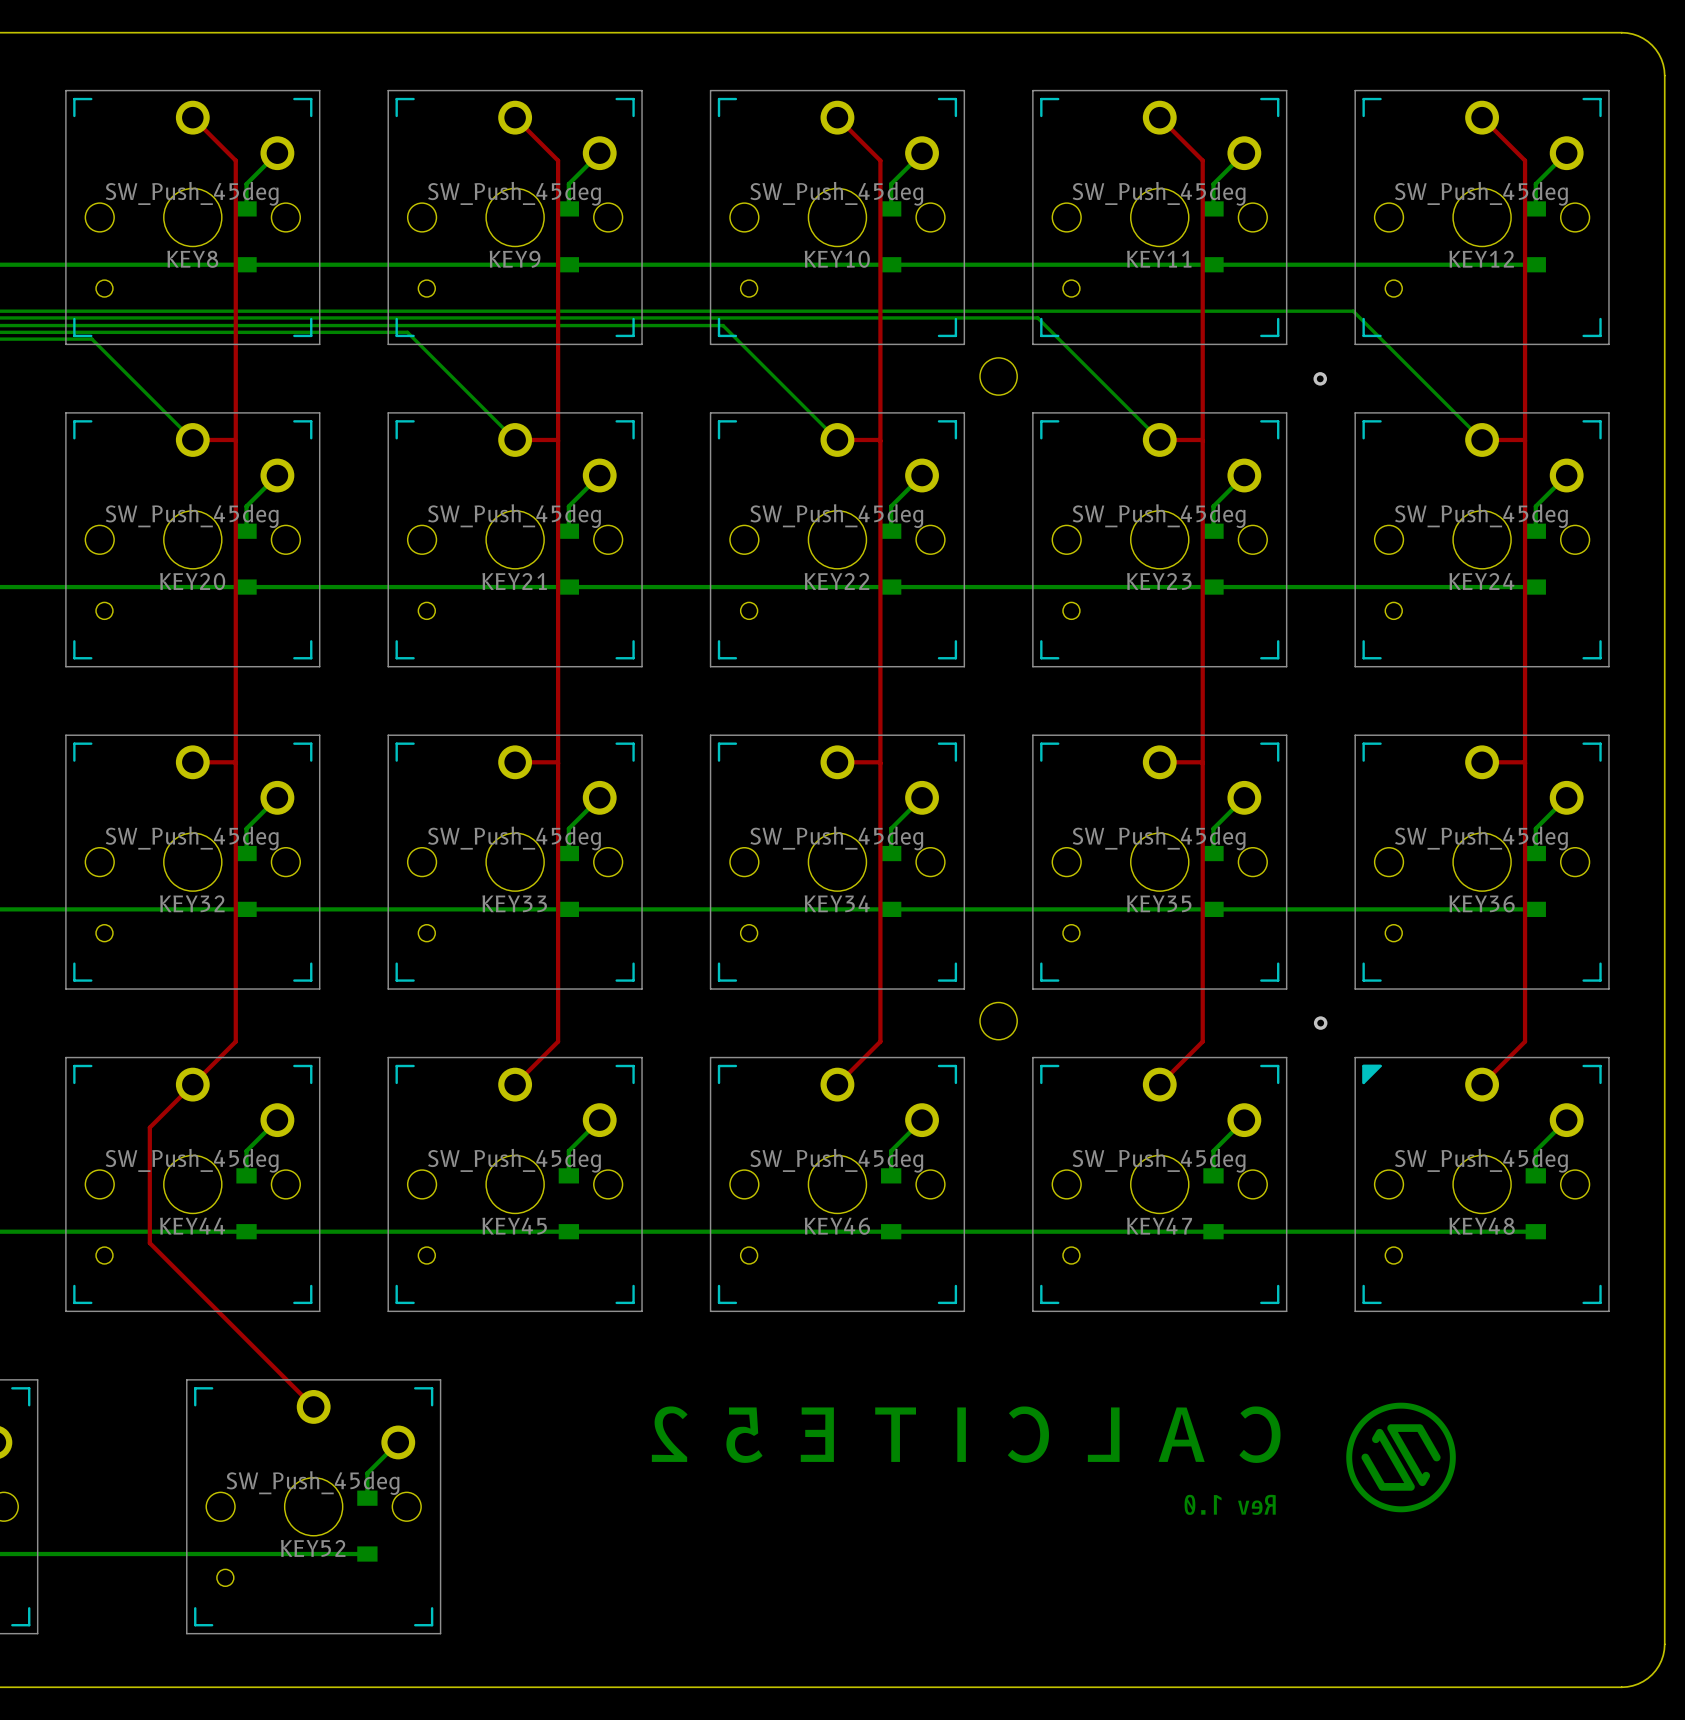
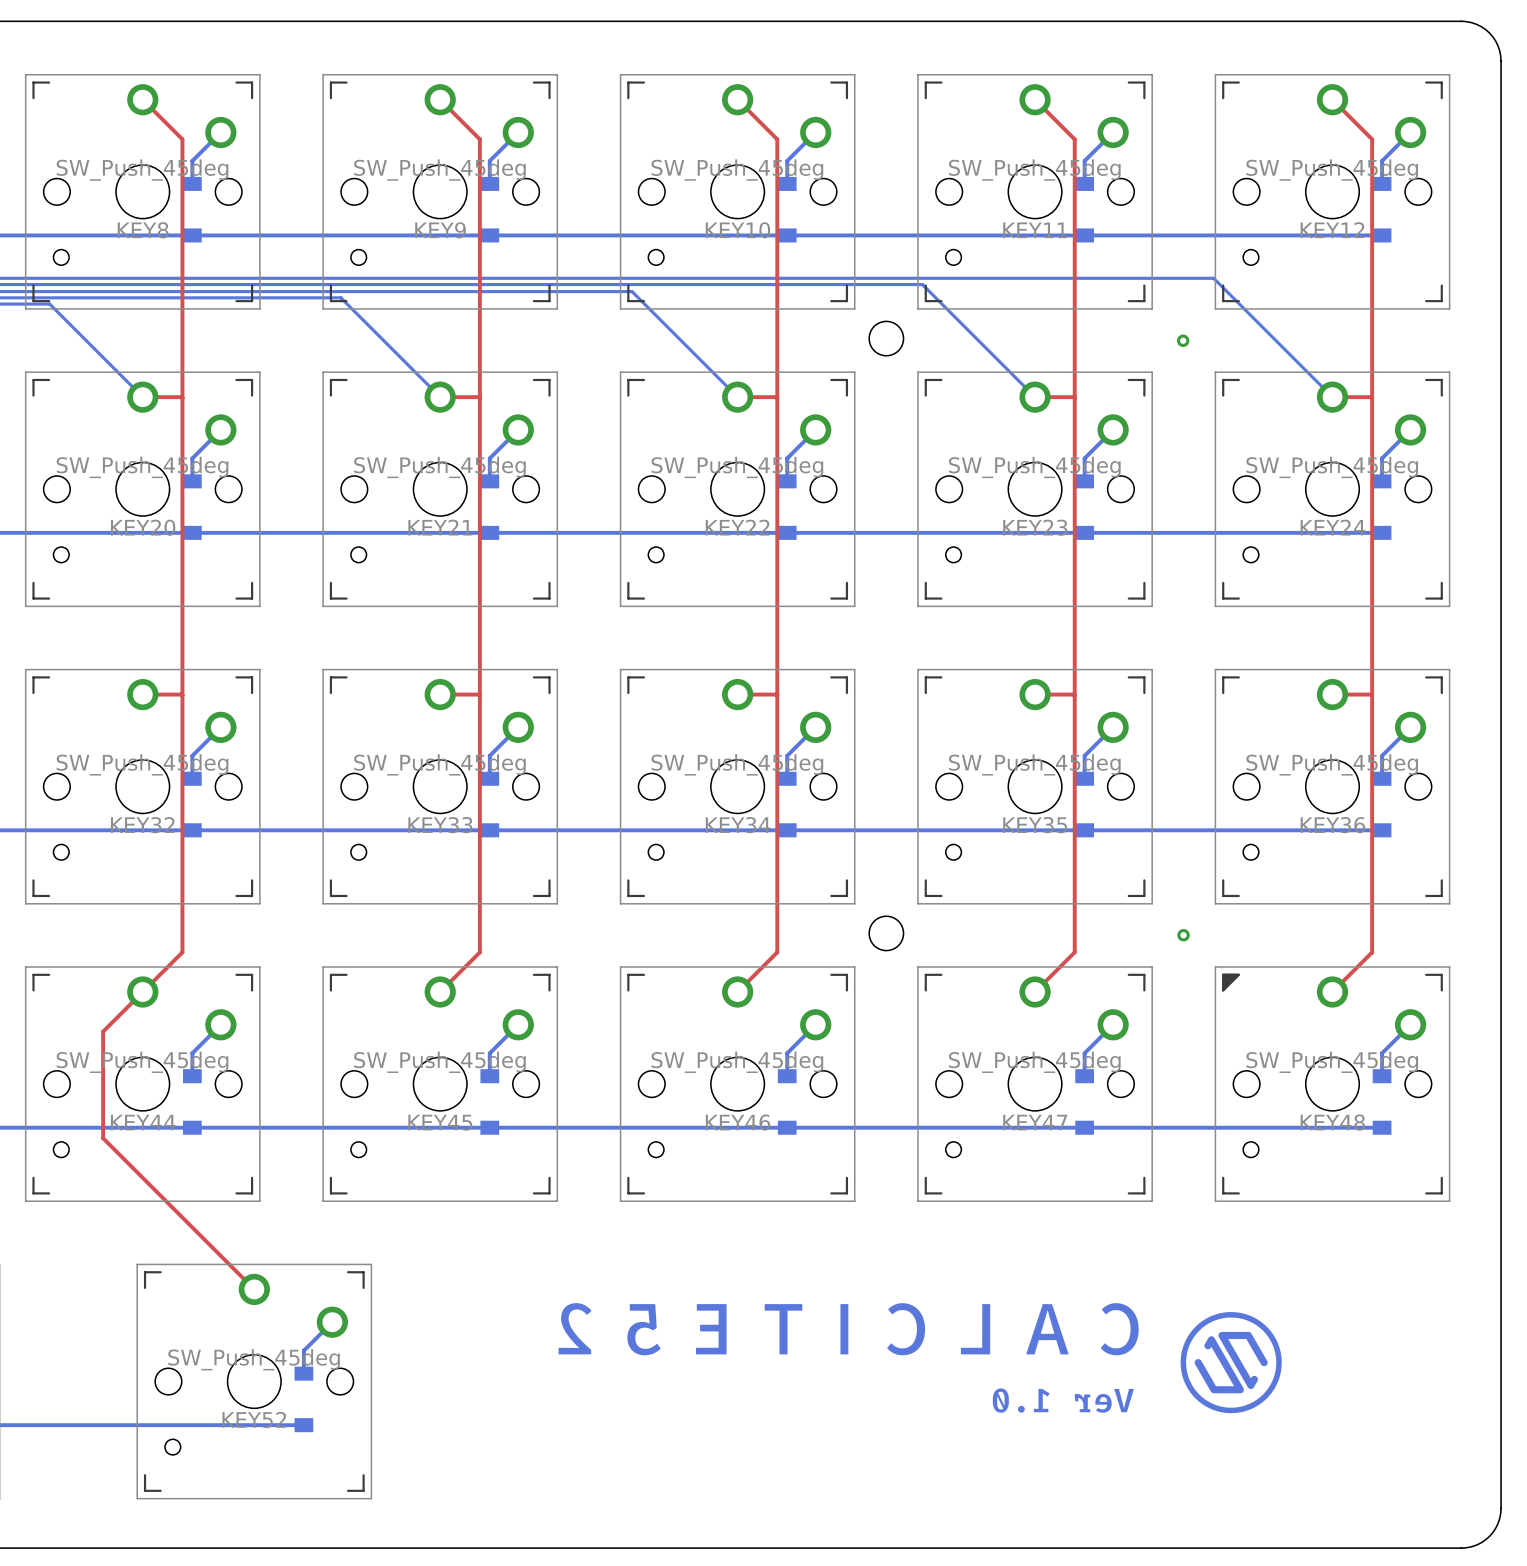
drawing: [651, 1406, 1281, 1463] -> none
drawing: none -> [558, 1303, 1139, 1413]
drawing position: (1401, 1457) -> (1231, 1362)
drawing: [1184, 1494, 1276, 1515] -> none

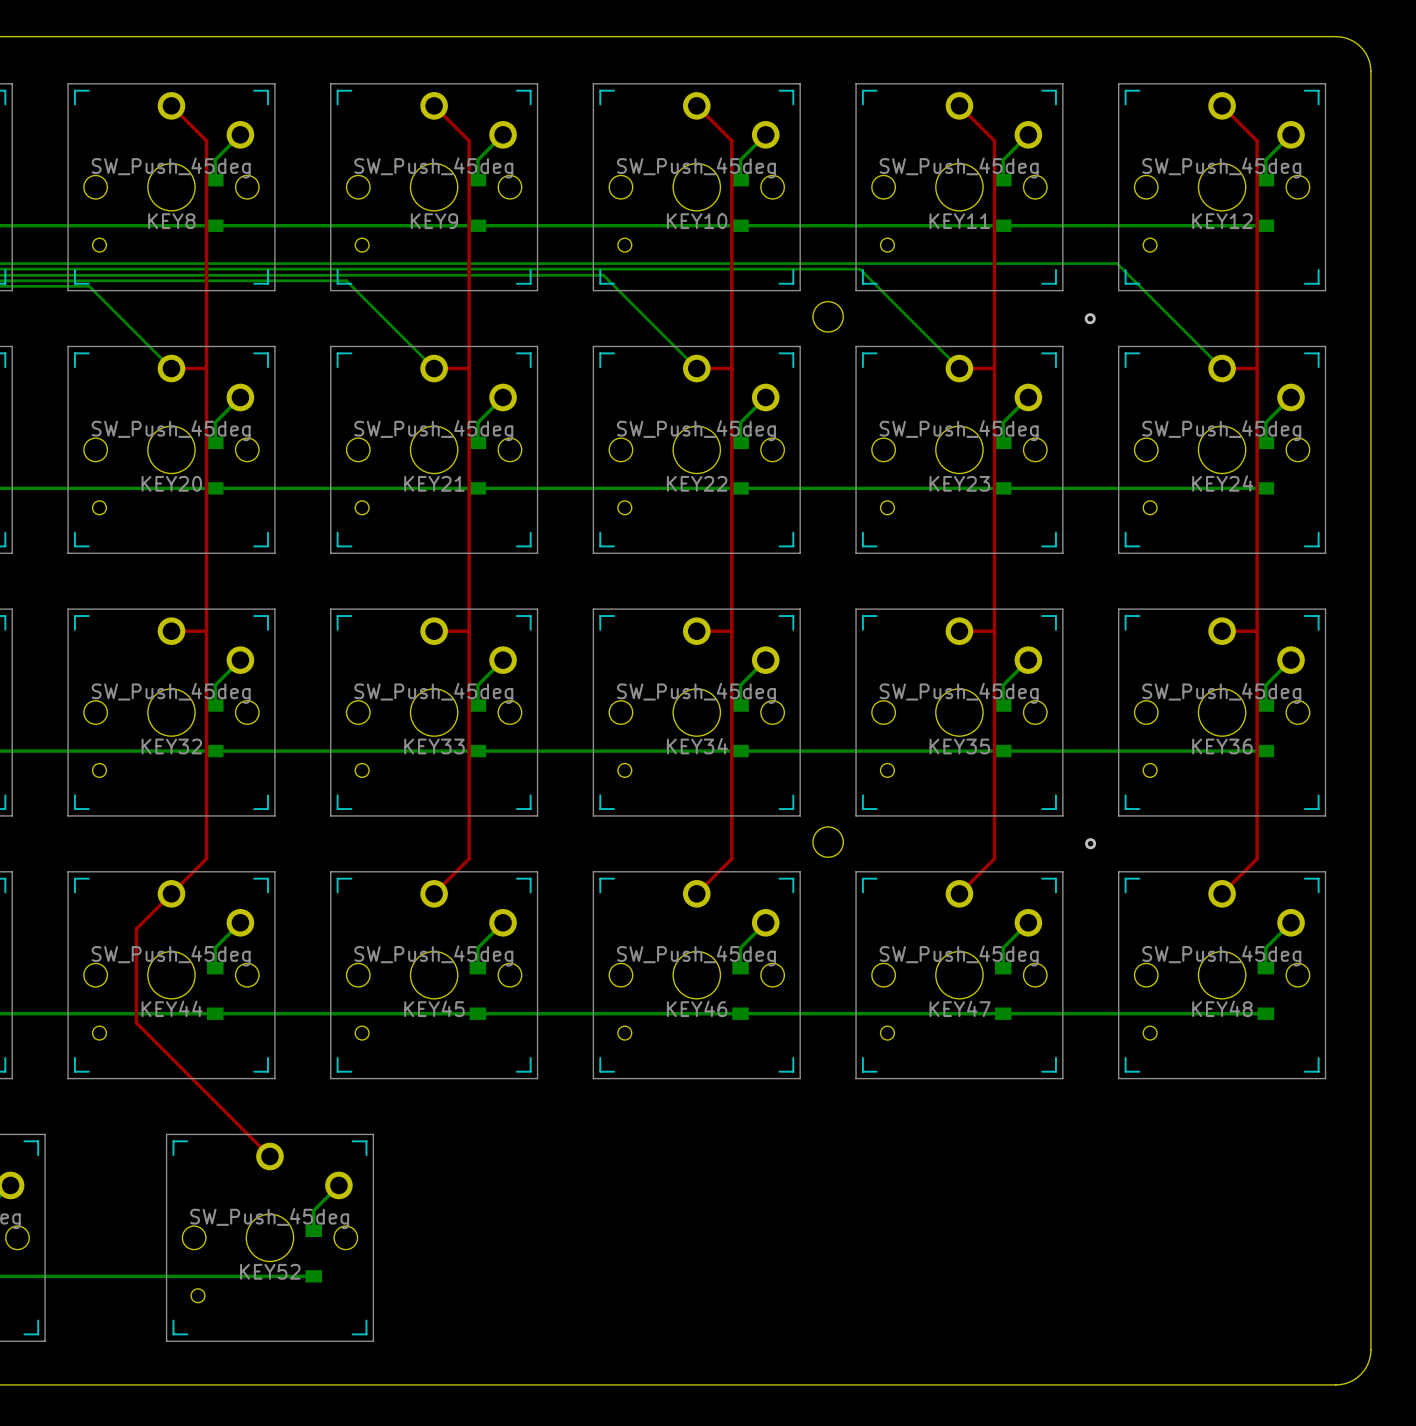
drawing: [1222, 973, 1240, 992] -> none
drawing: [558, 1303, 1139, 1413] -> none
drawing: [1180, 1312, 1282, 1414] -> none

